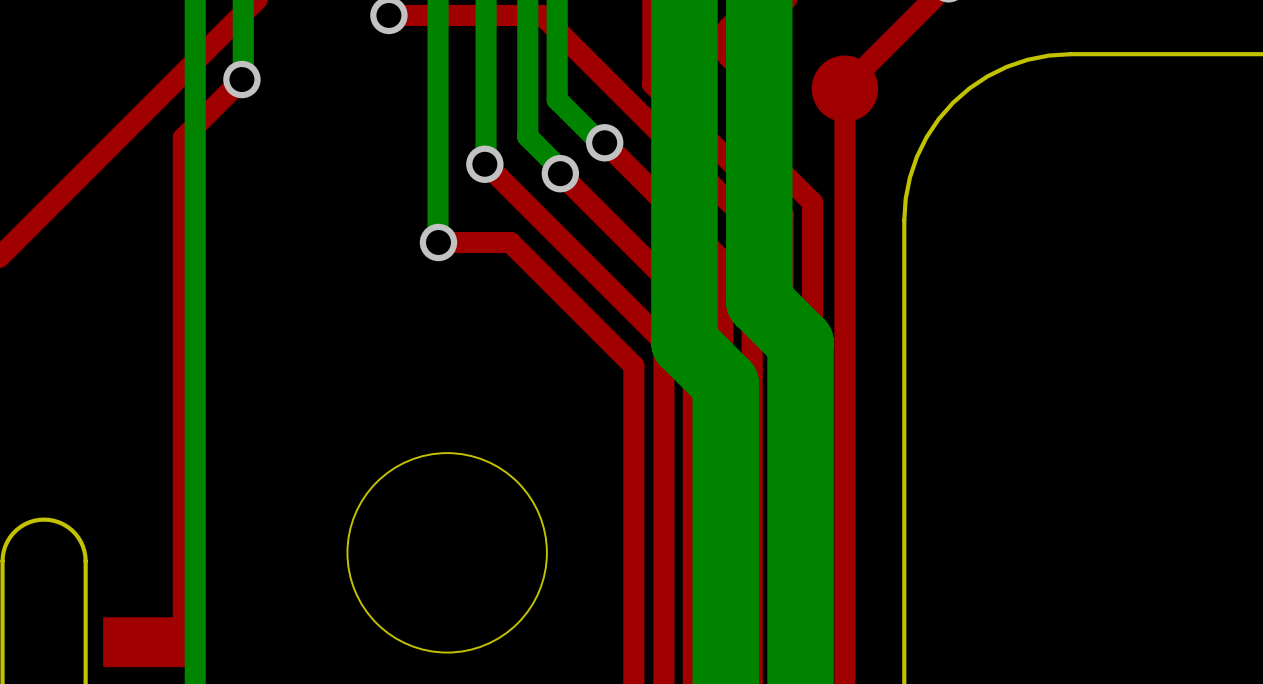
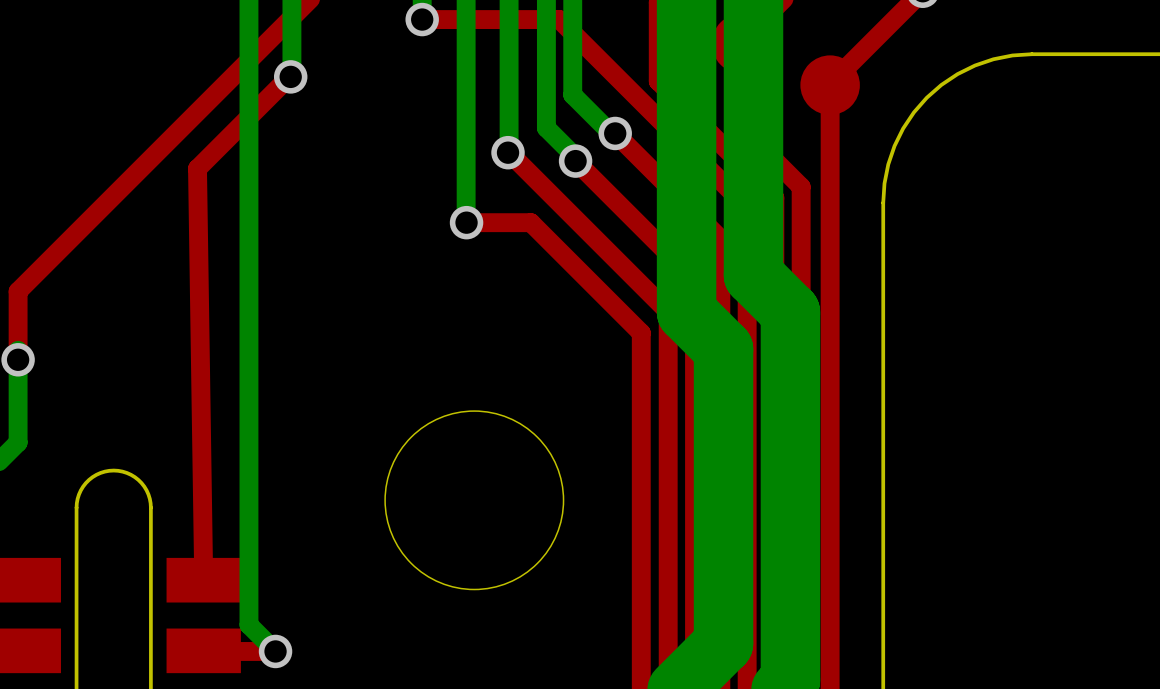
top track: (241, 79) (183, 138) (183, 642) -> (289, 76) (197, 168) (203, 580)

